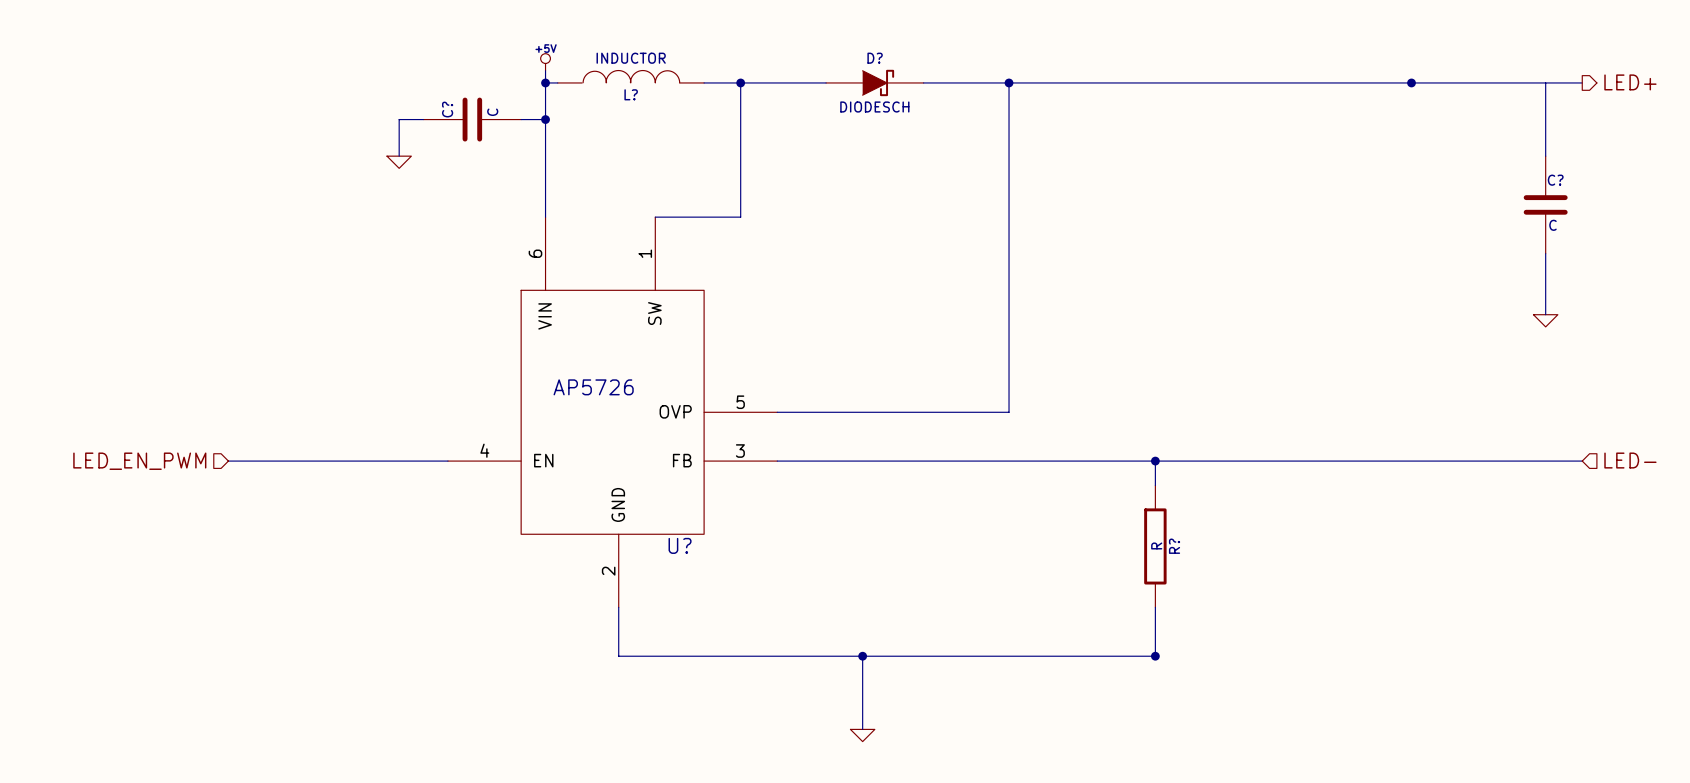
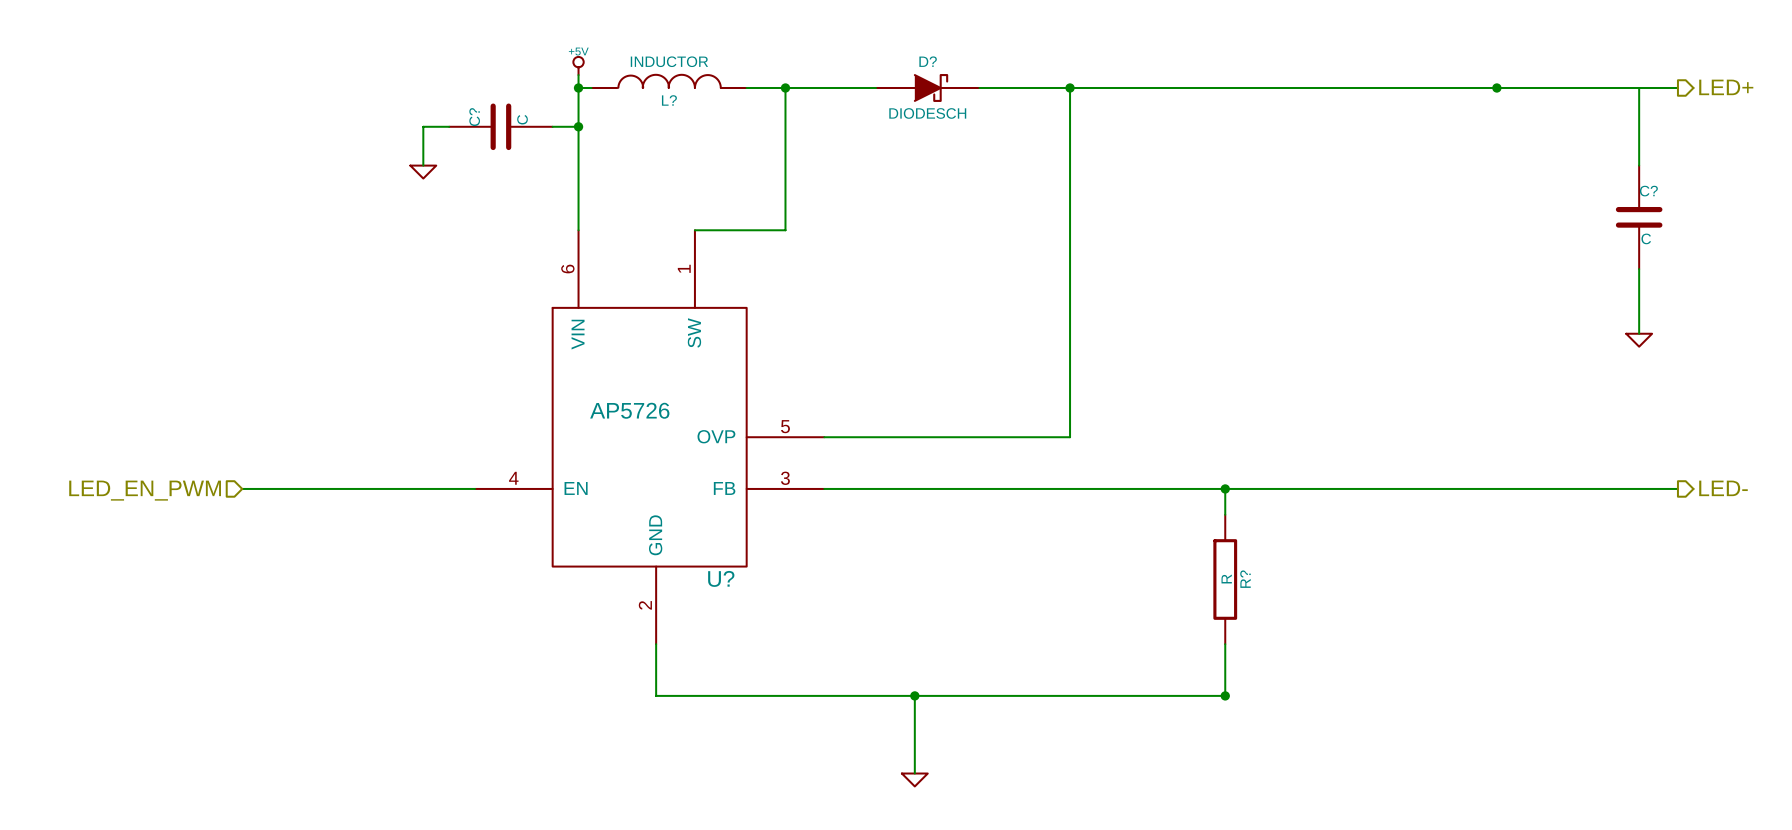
hierarchical label shape: input (1630, 460) -> output (1723, 488)

